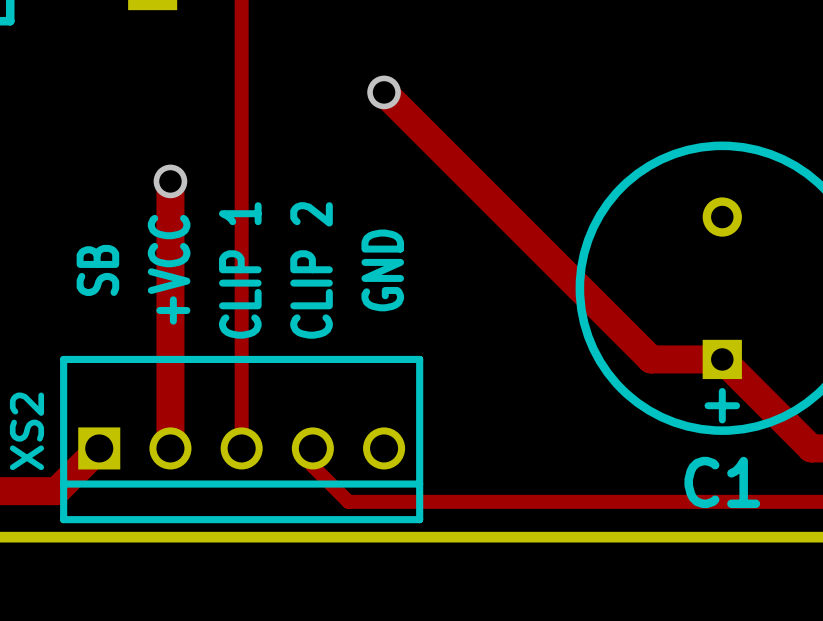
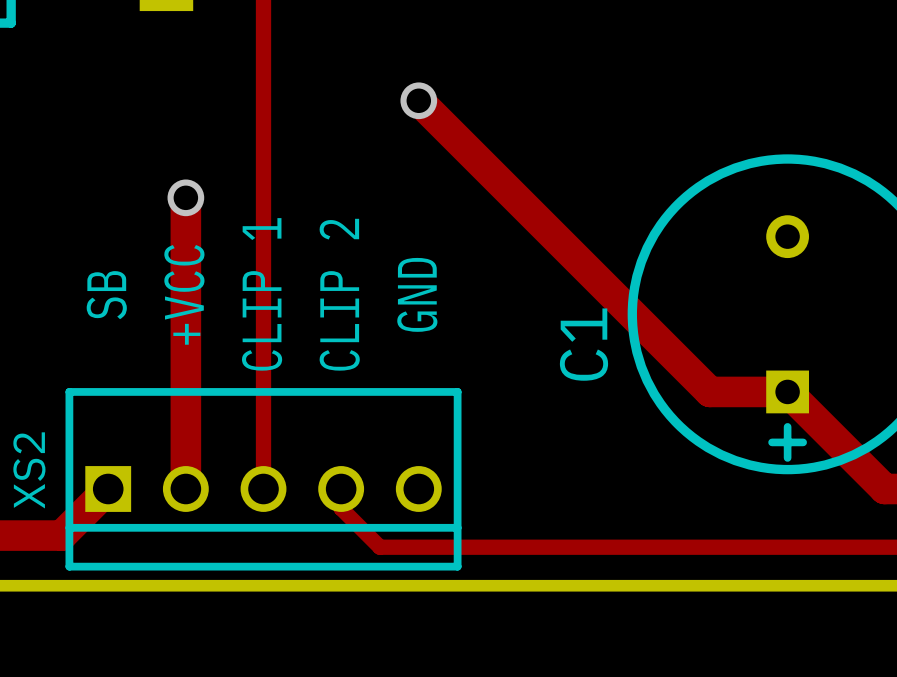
C1 name rotation: 0° (722, 482) -> 90° counterclockwise (583, 344)
C1 name position: C1 (722, 482) -> C1 (583, 344)

